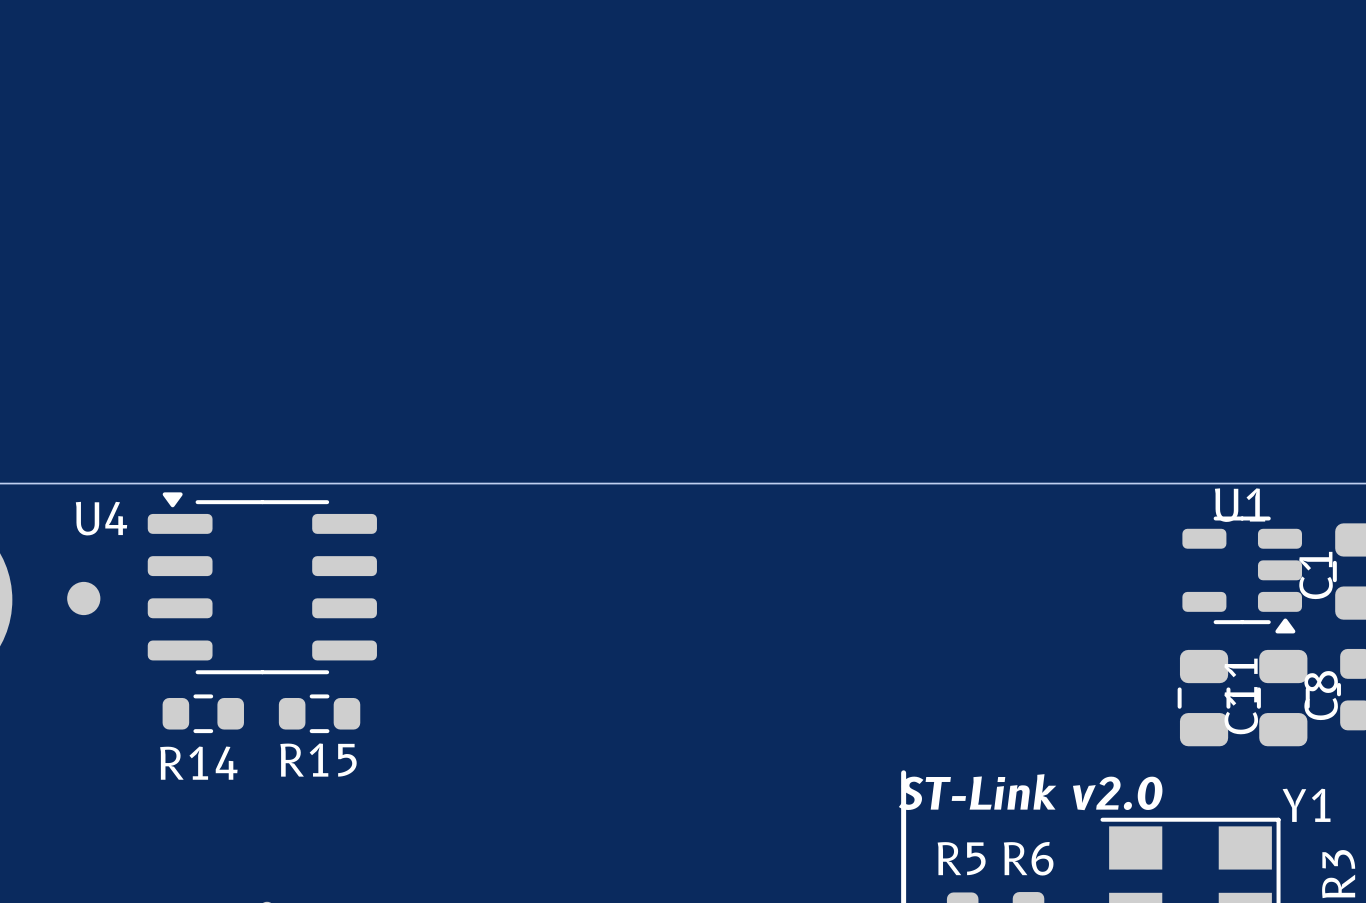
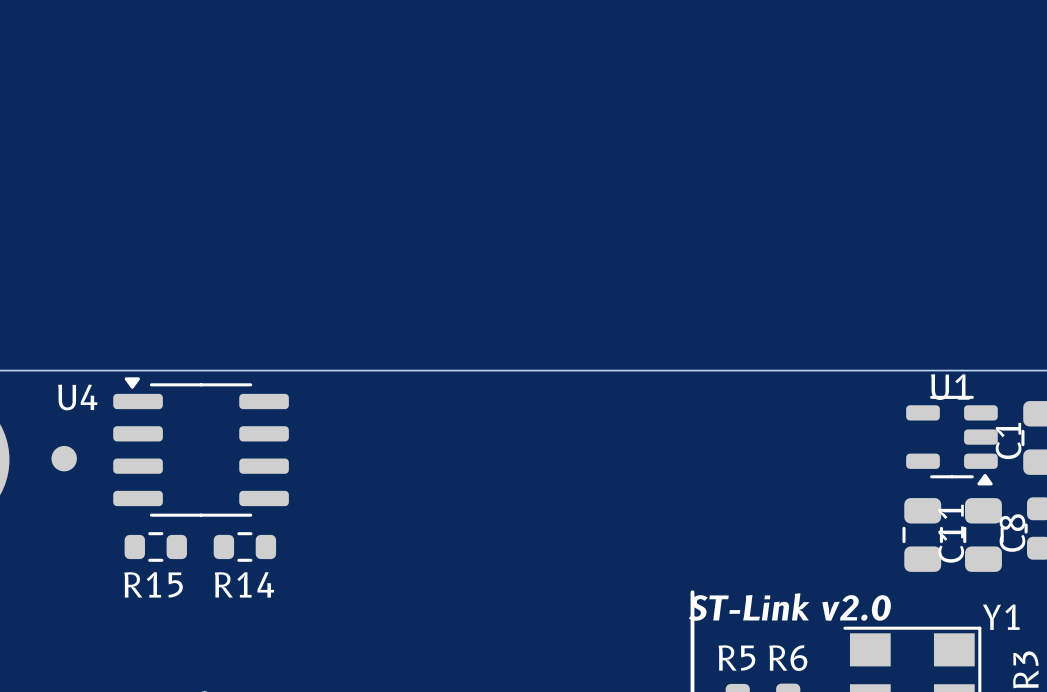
R15 name: R15 (318, 760) -> R14 (244, 584)
R14 name: R14 (198, 763) -> R15 (153, 584)

